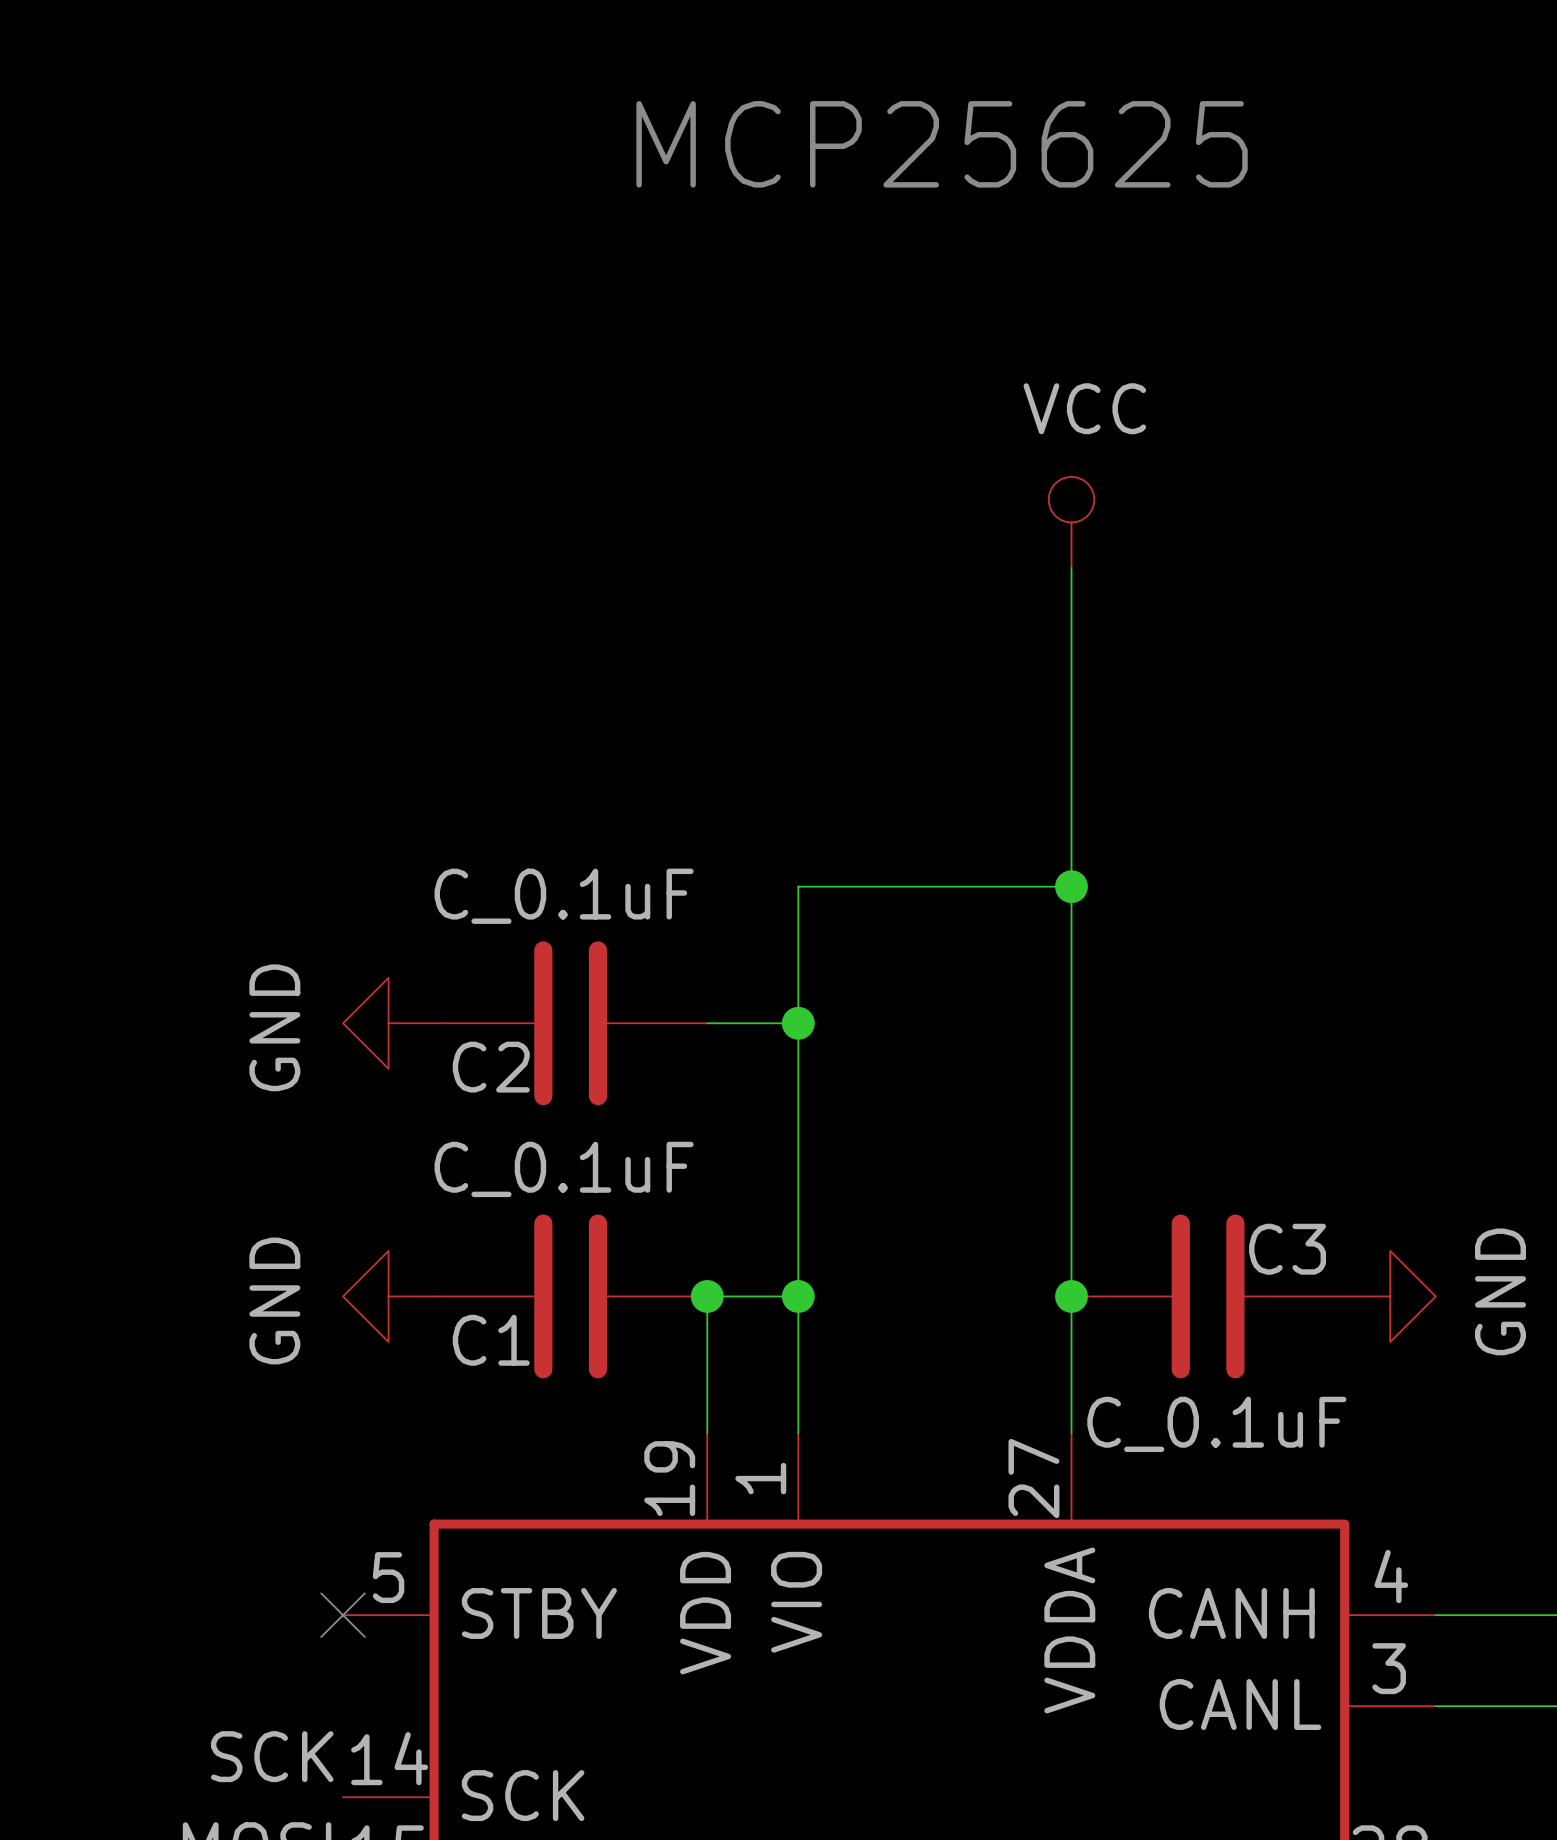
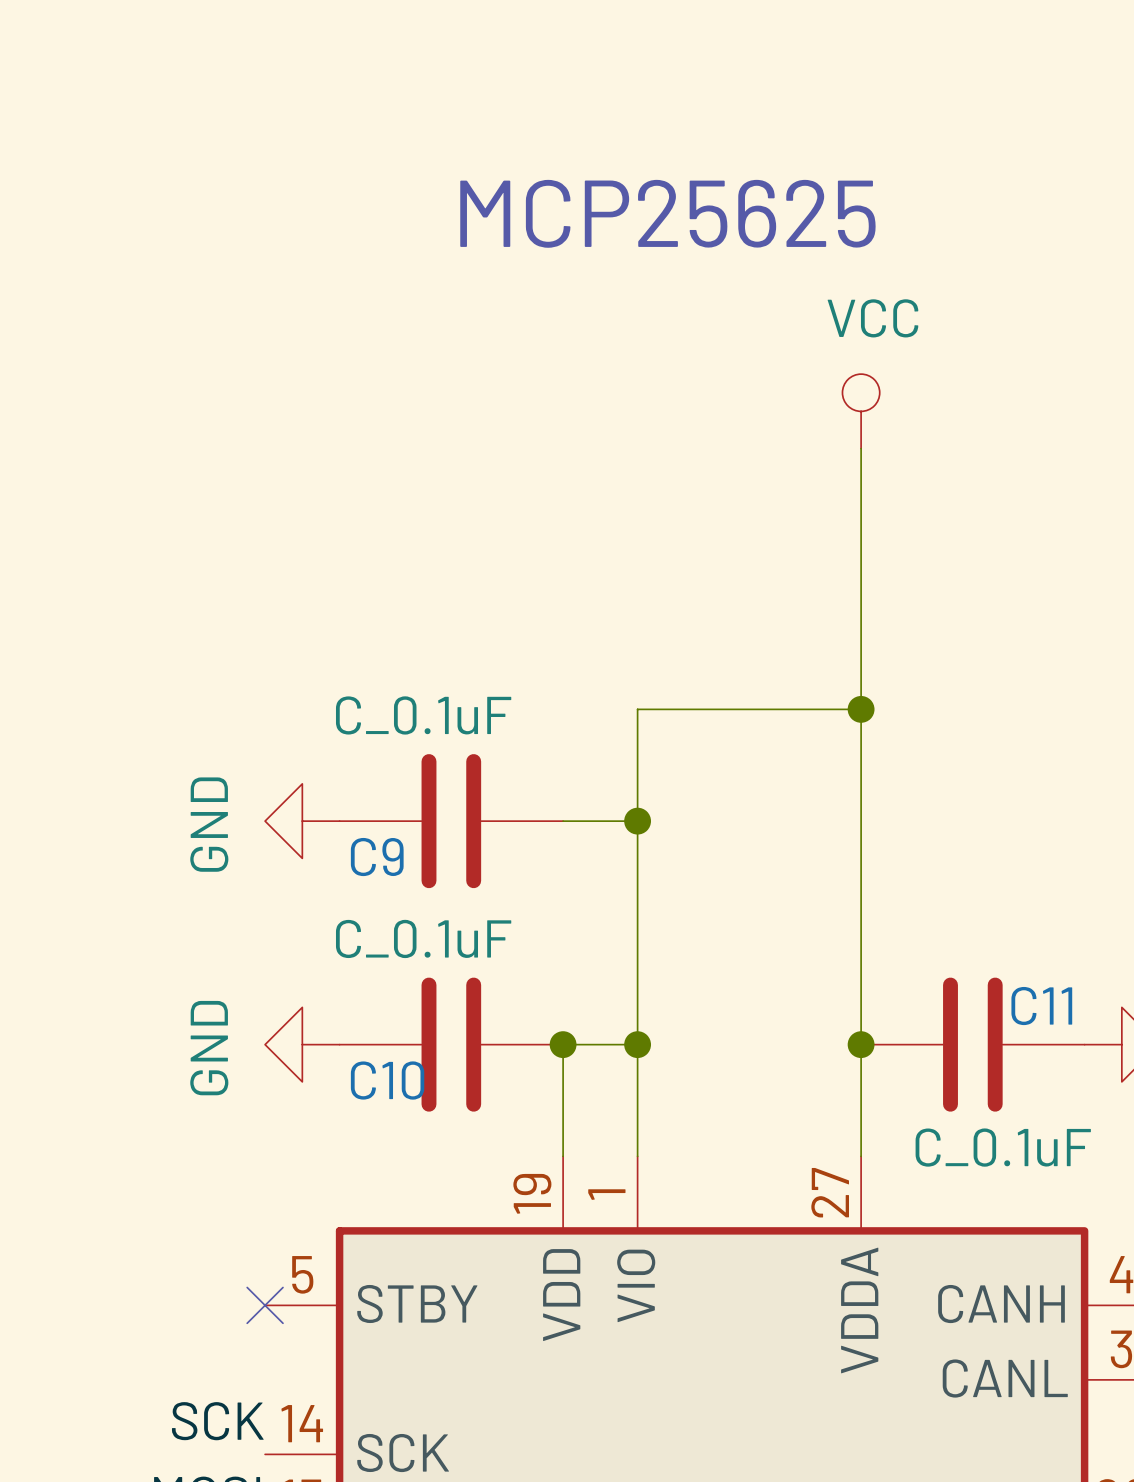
text position: MCP25625 (942, 144) -> MCP25625 (667, 213)
C2 name: C2 (491, 1067) -> C9 (377, 857)
C3 name: C3 (1287, 1249) -> C11 (1041, 1006)
C1 name: C1 (491, 1340) -> C10 (387, 1080)

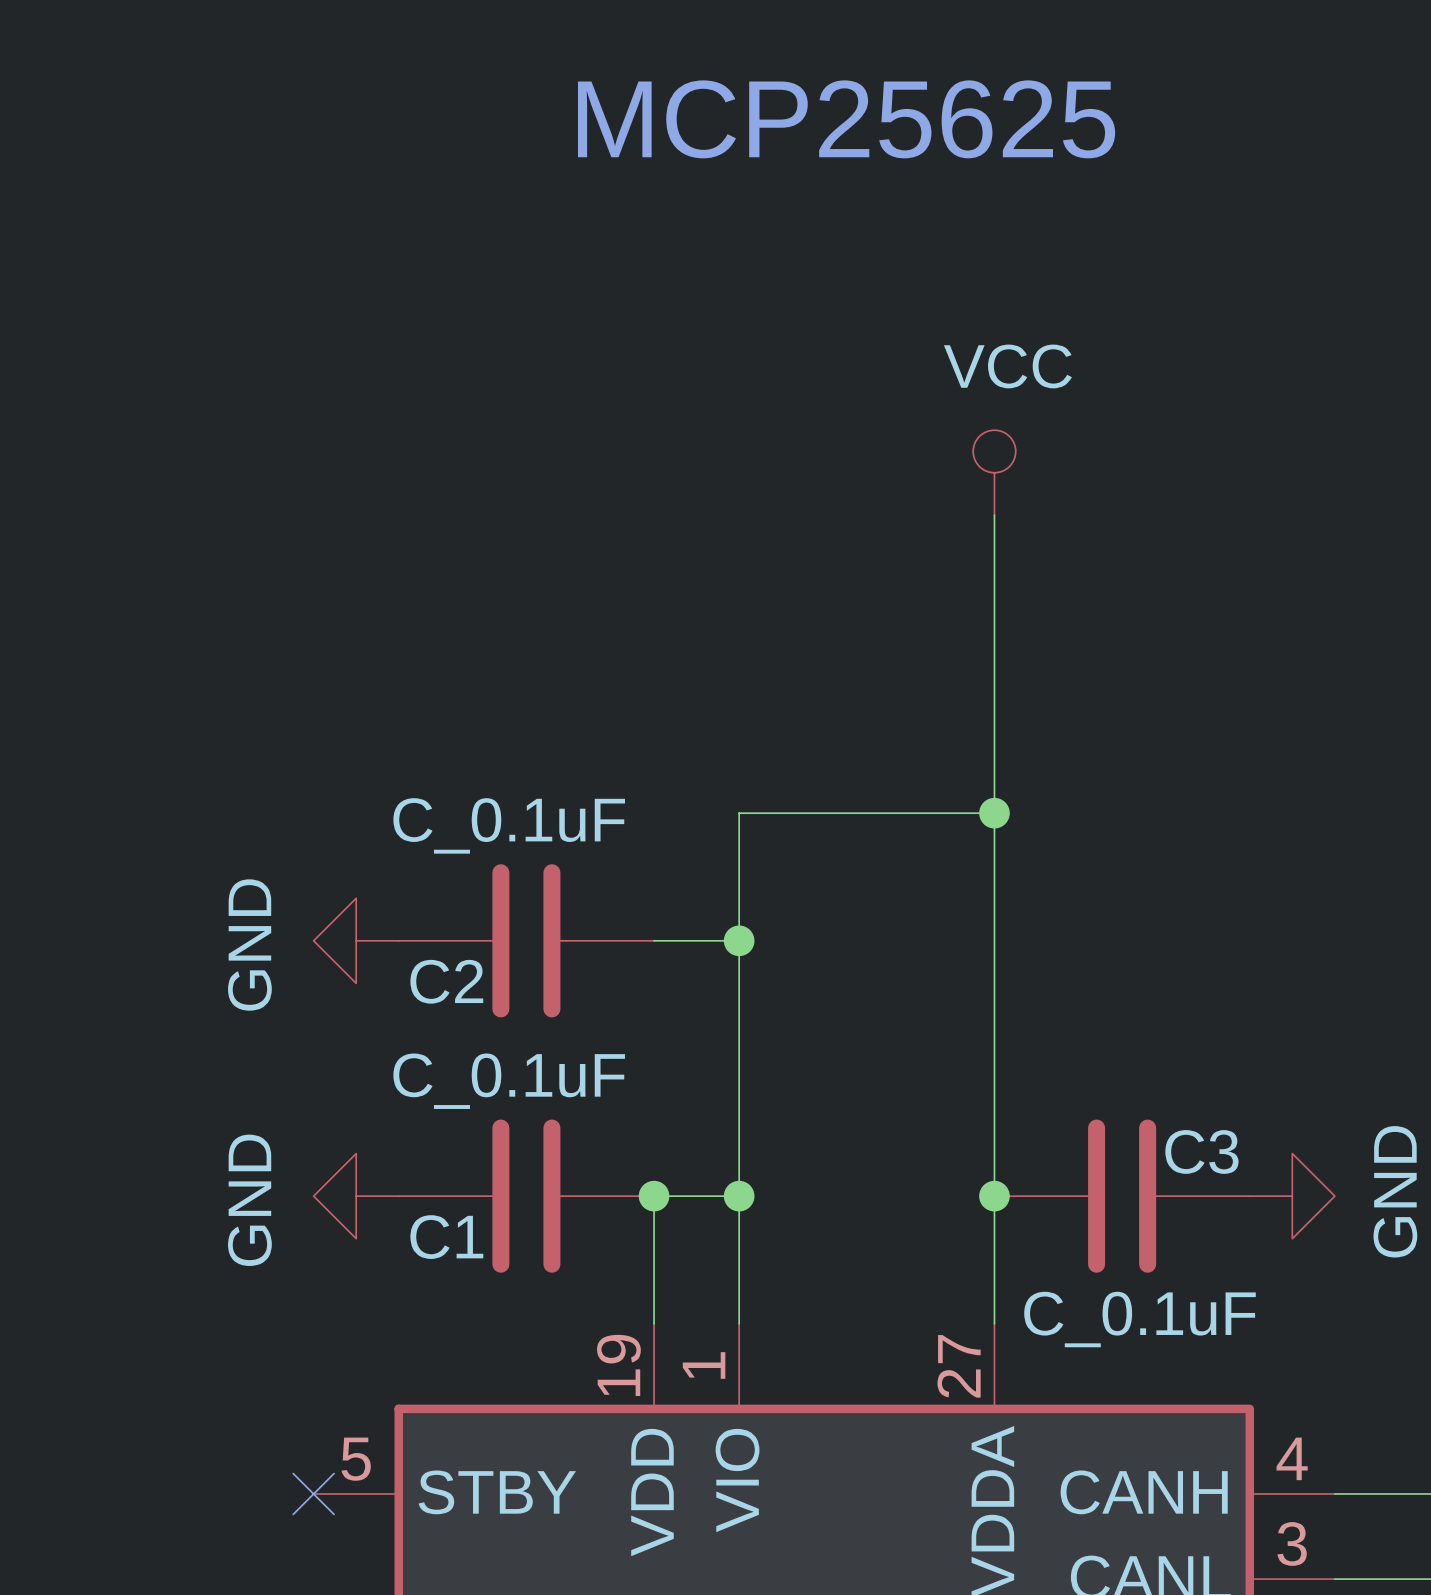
text position: MCP25625 (667, 213) -> MCP25625 (846, 119)
C9 name: C9 (377, 857) -> C2 (446, 981)
C11 name: C11 (1041, 1006) -> C3 (1201, 1151)
C10 name: C10 (387, 1080) -> C1 (446, 1237)

